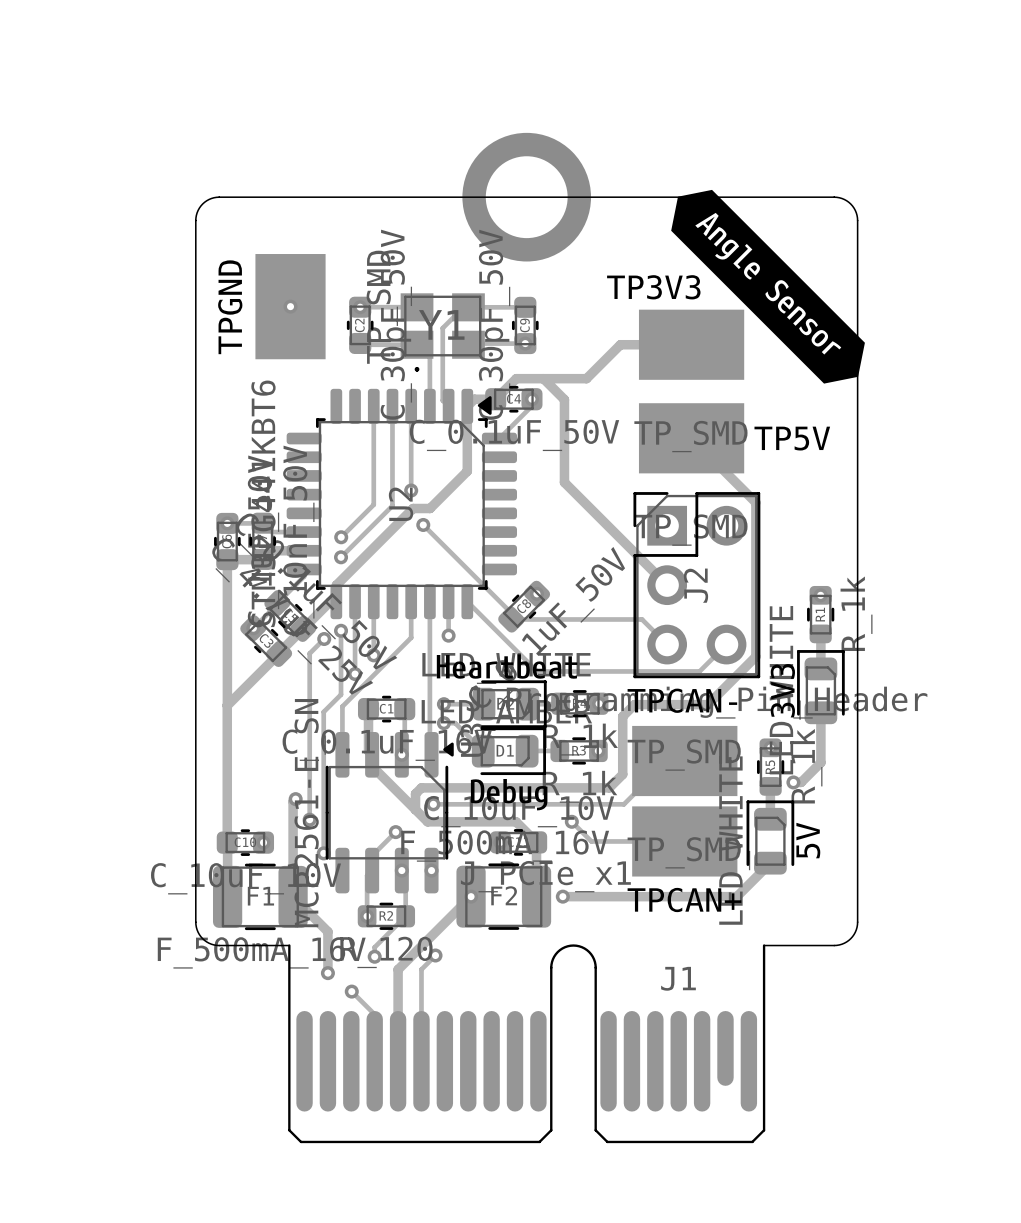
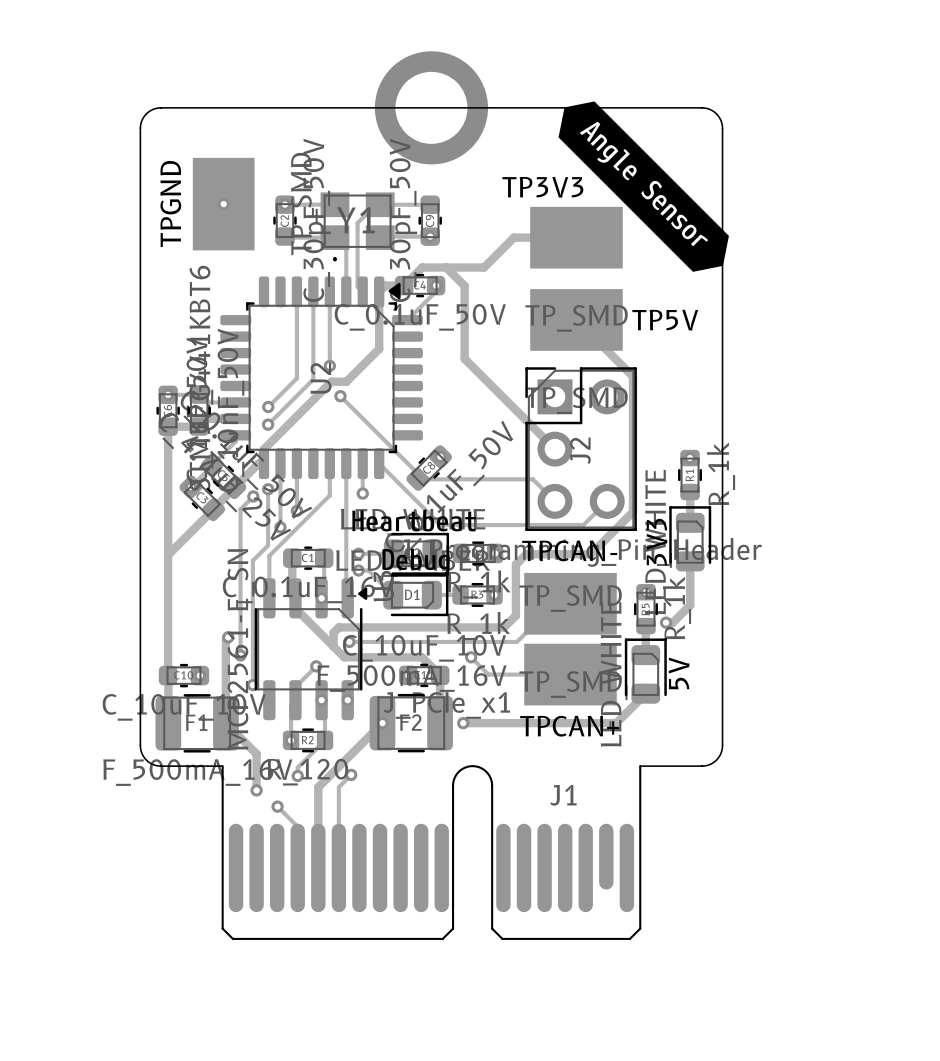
drawing position: (509, 794) -> (416, 562)

